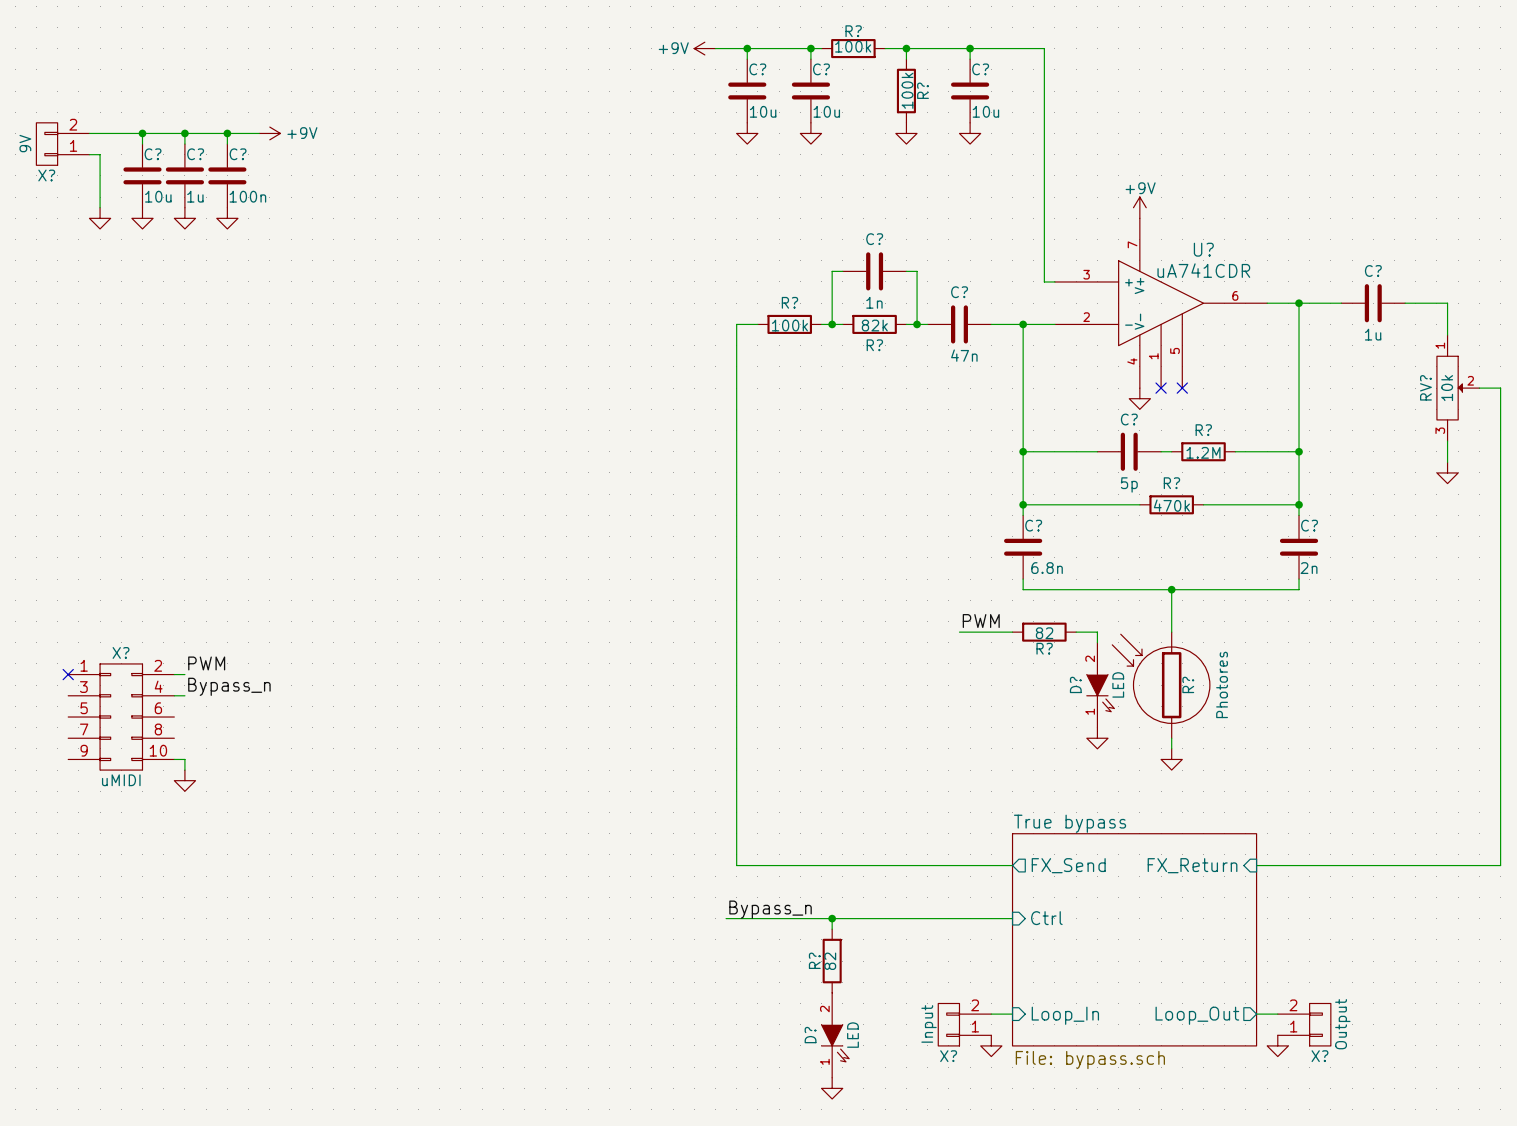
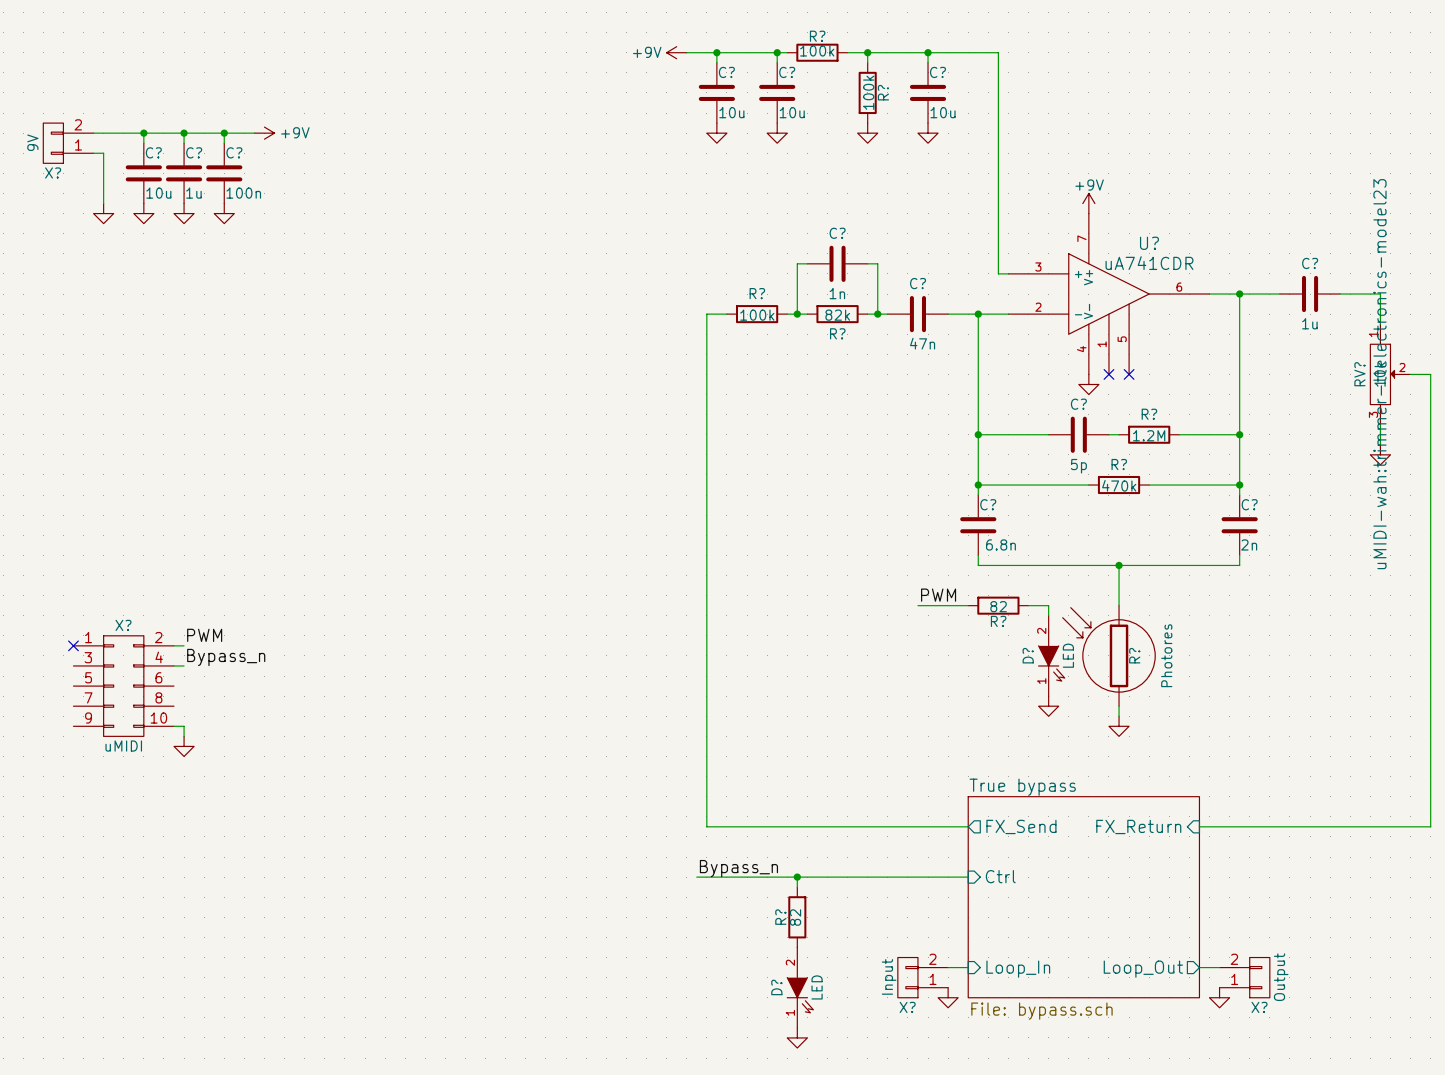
RV? text: none -> uMIDI-wah:trimmer-ttelectronics-model23 (1379, 374)

